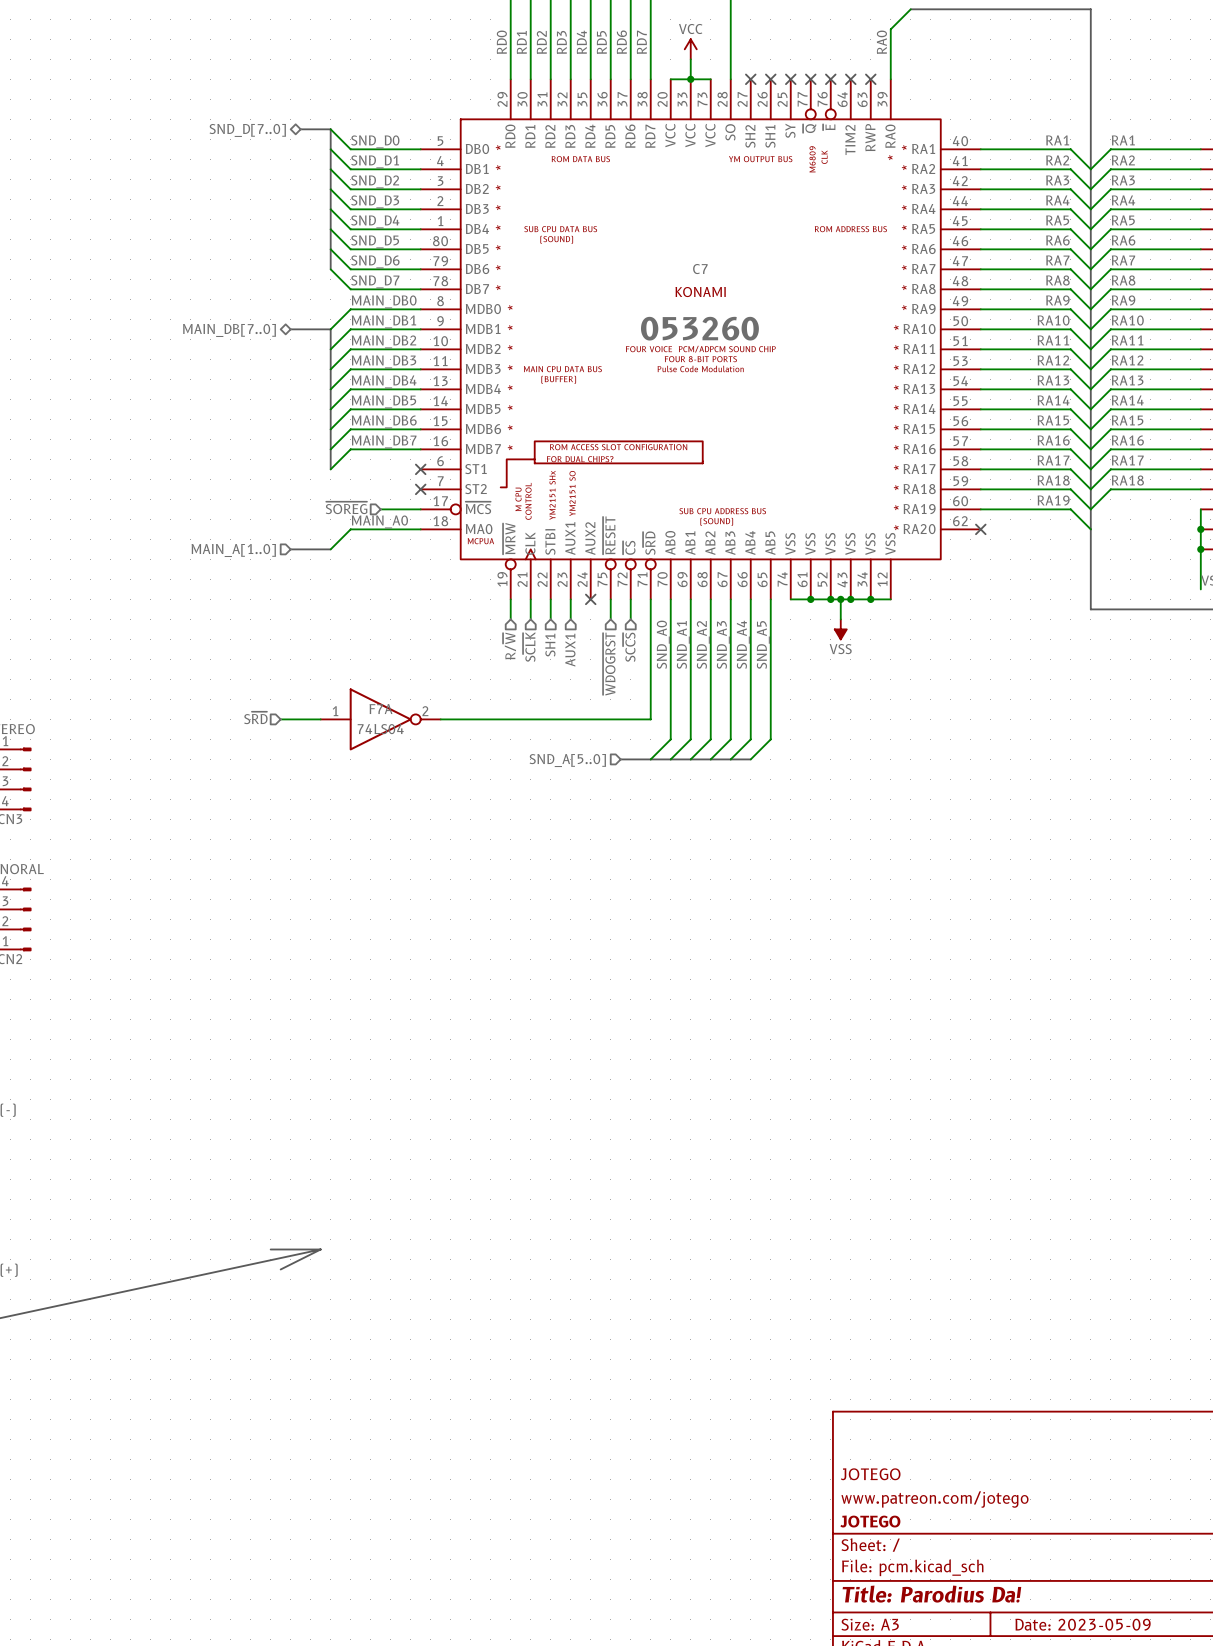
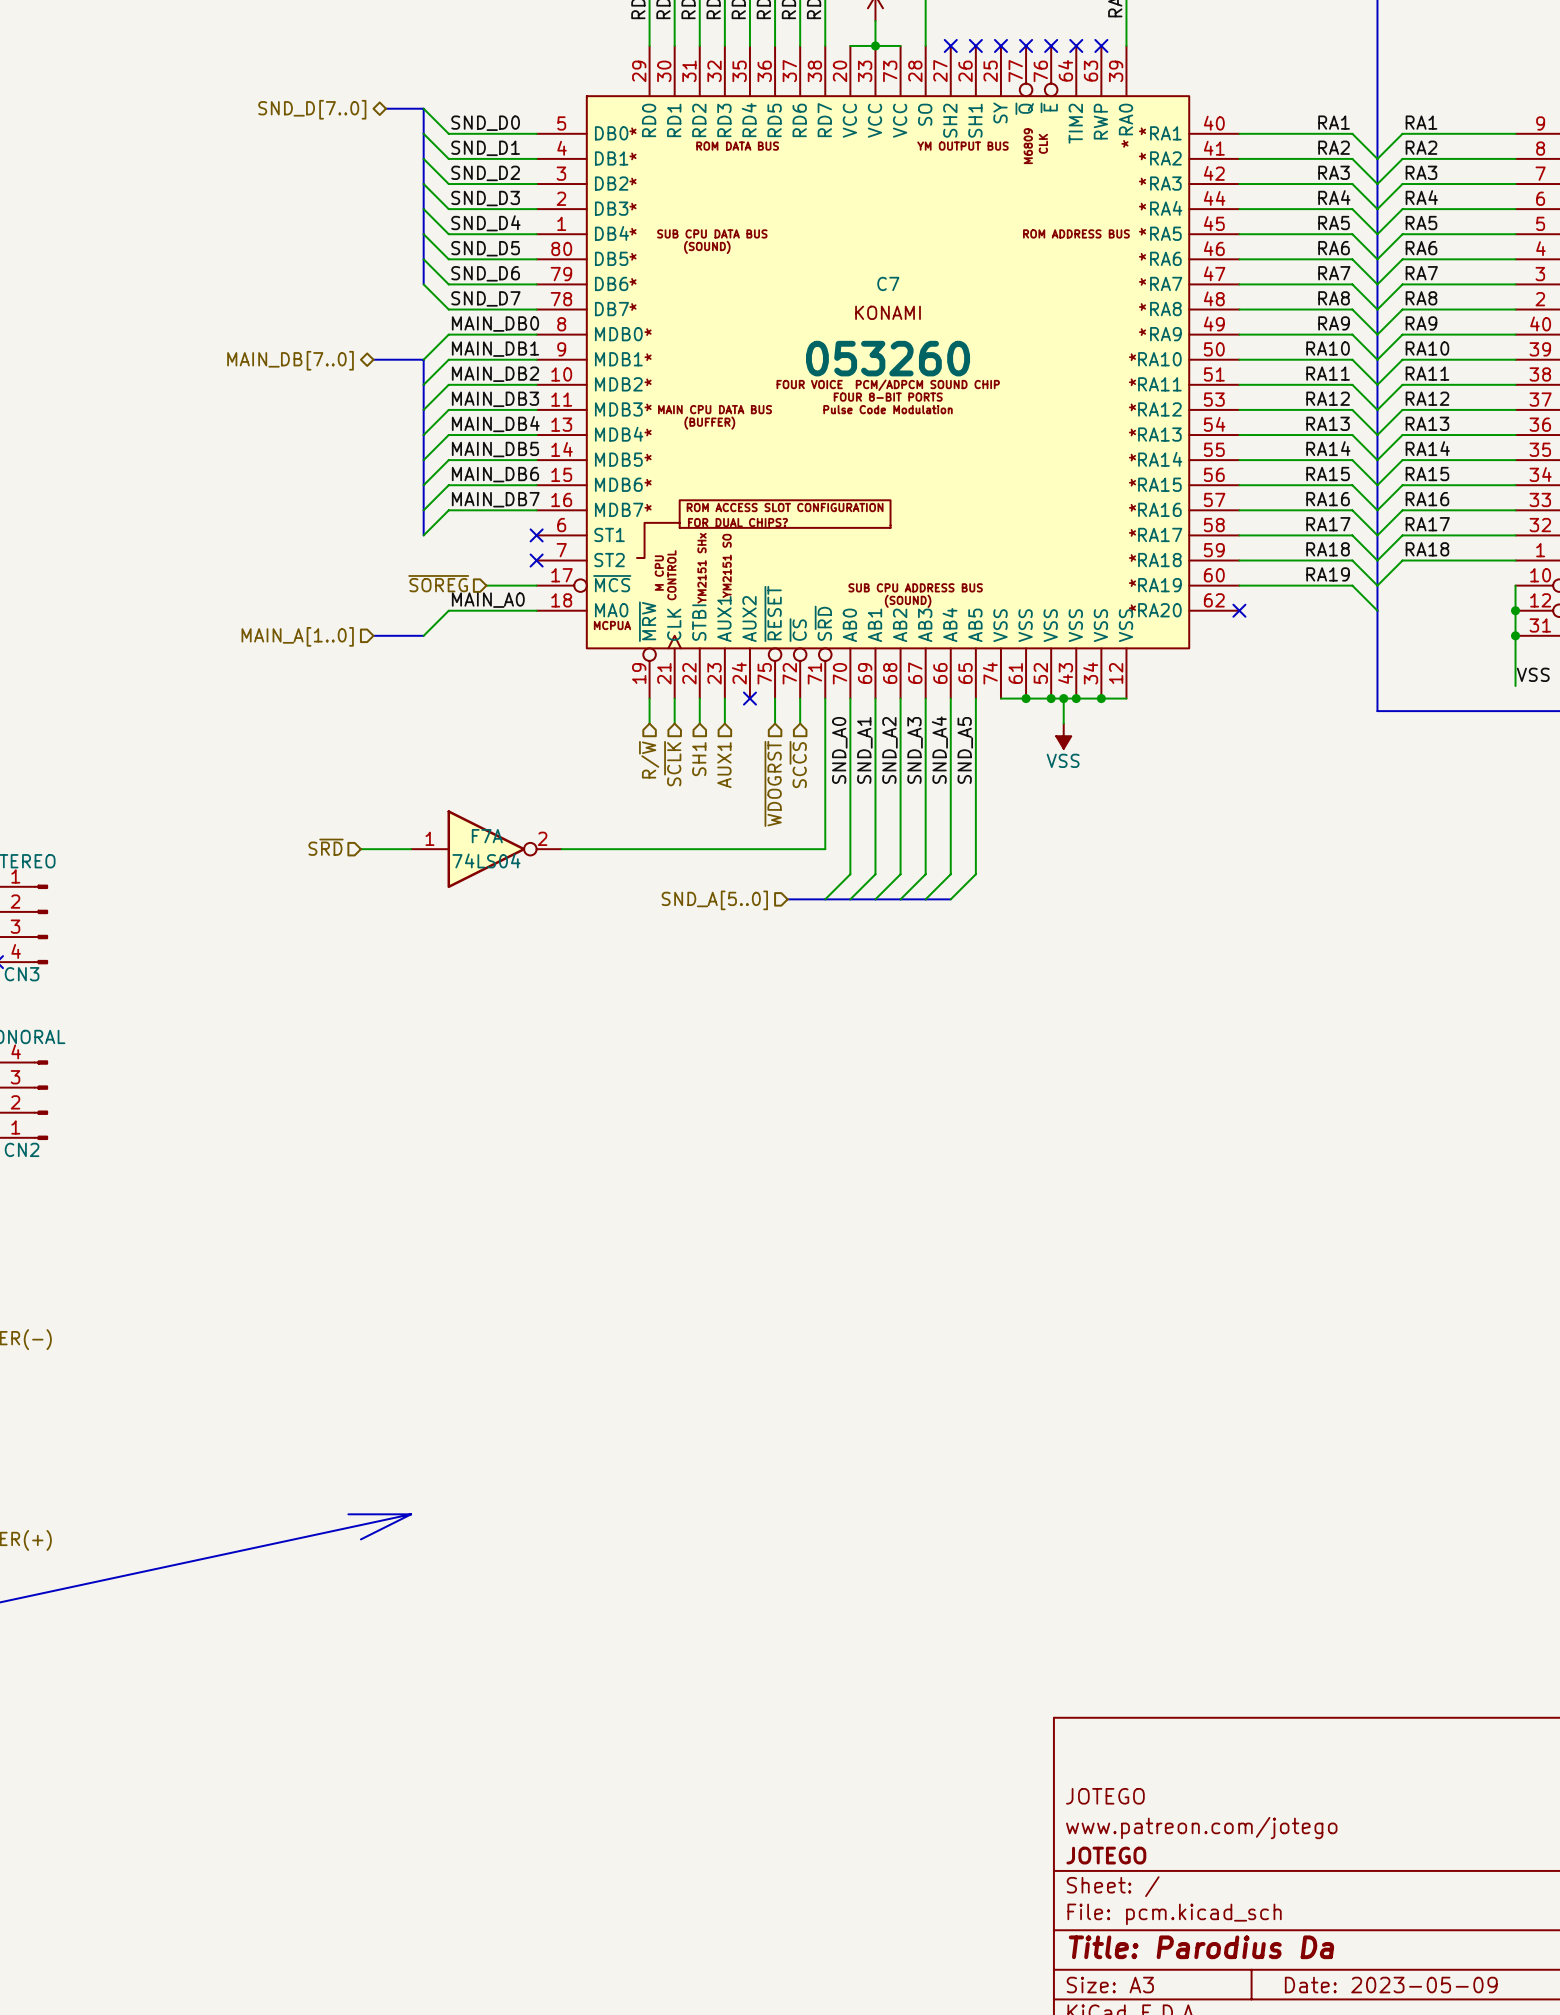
title block: Title: Parodius Da! (931, 1594) -> Title: Parodius Da (1201, 1947)

